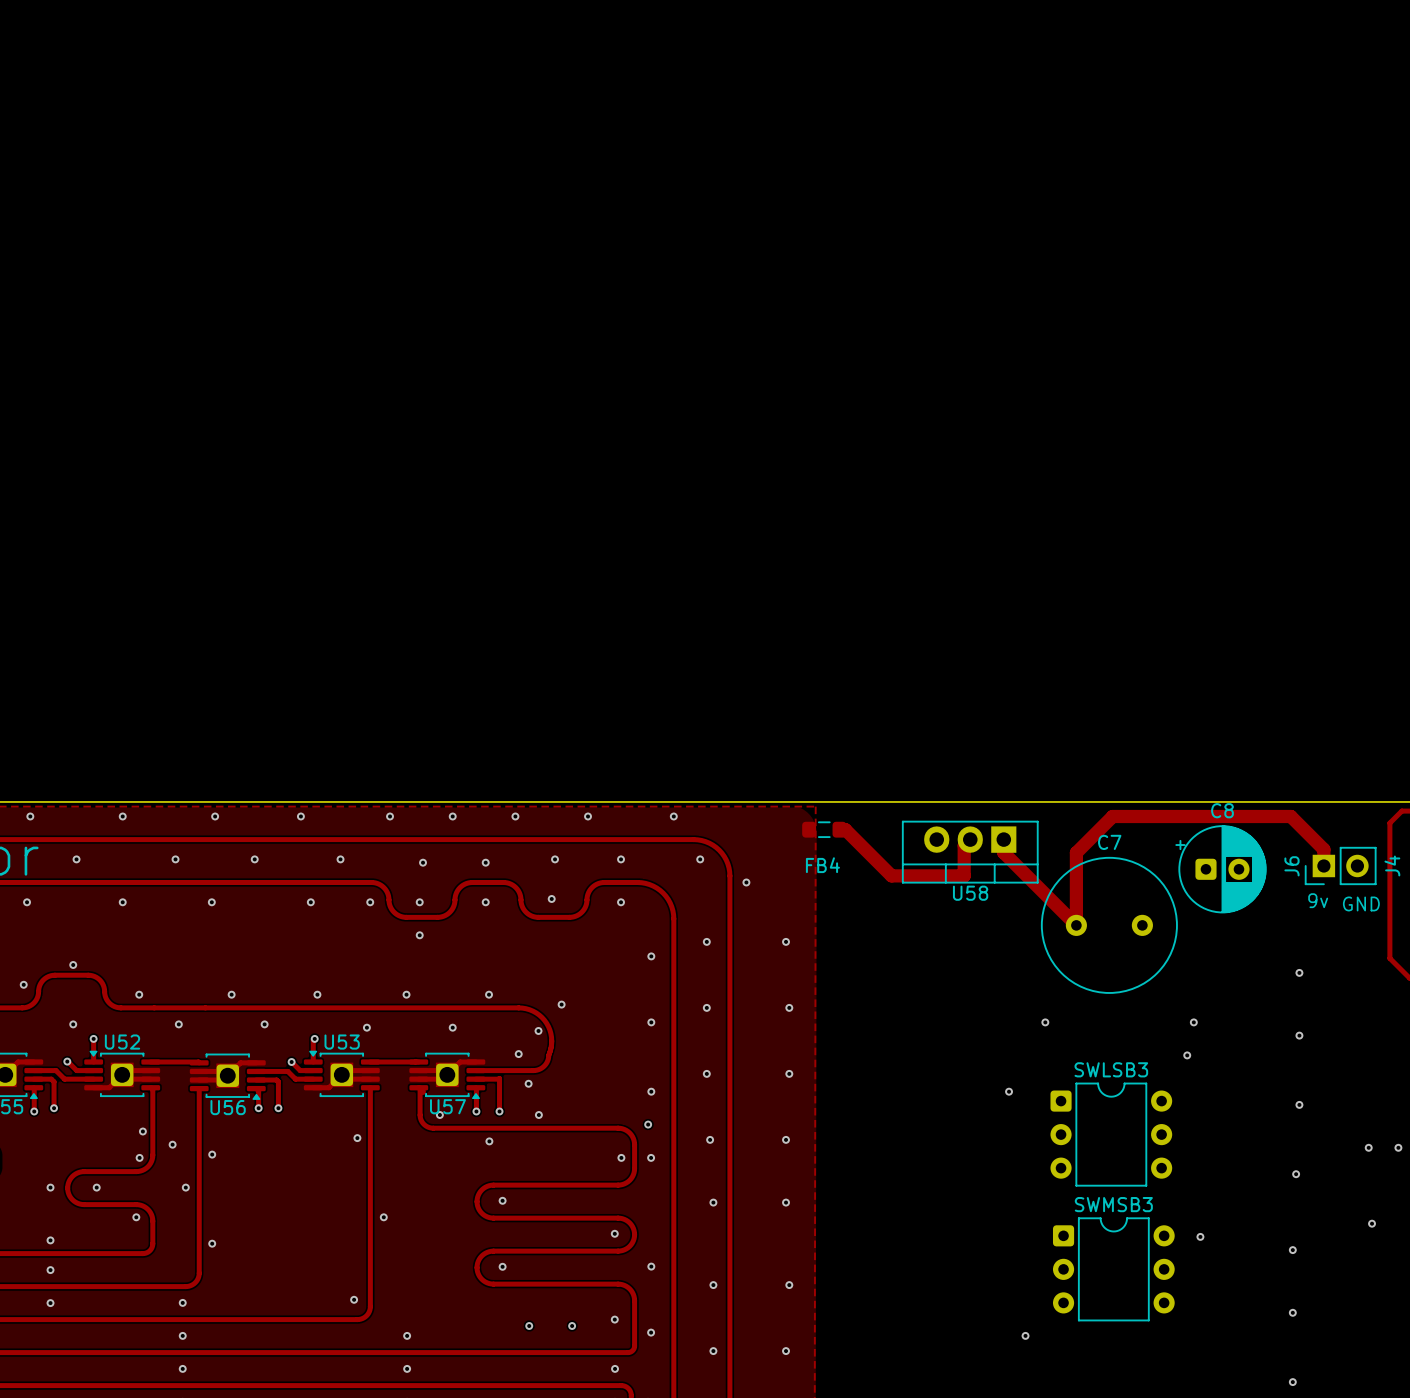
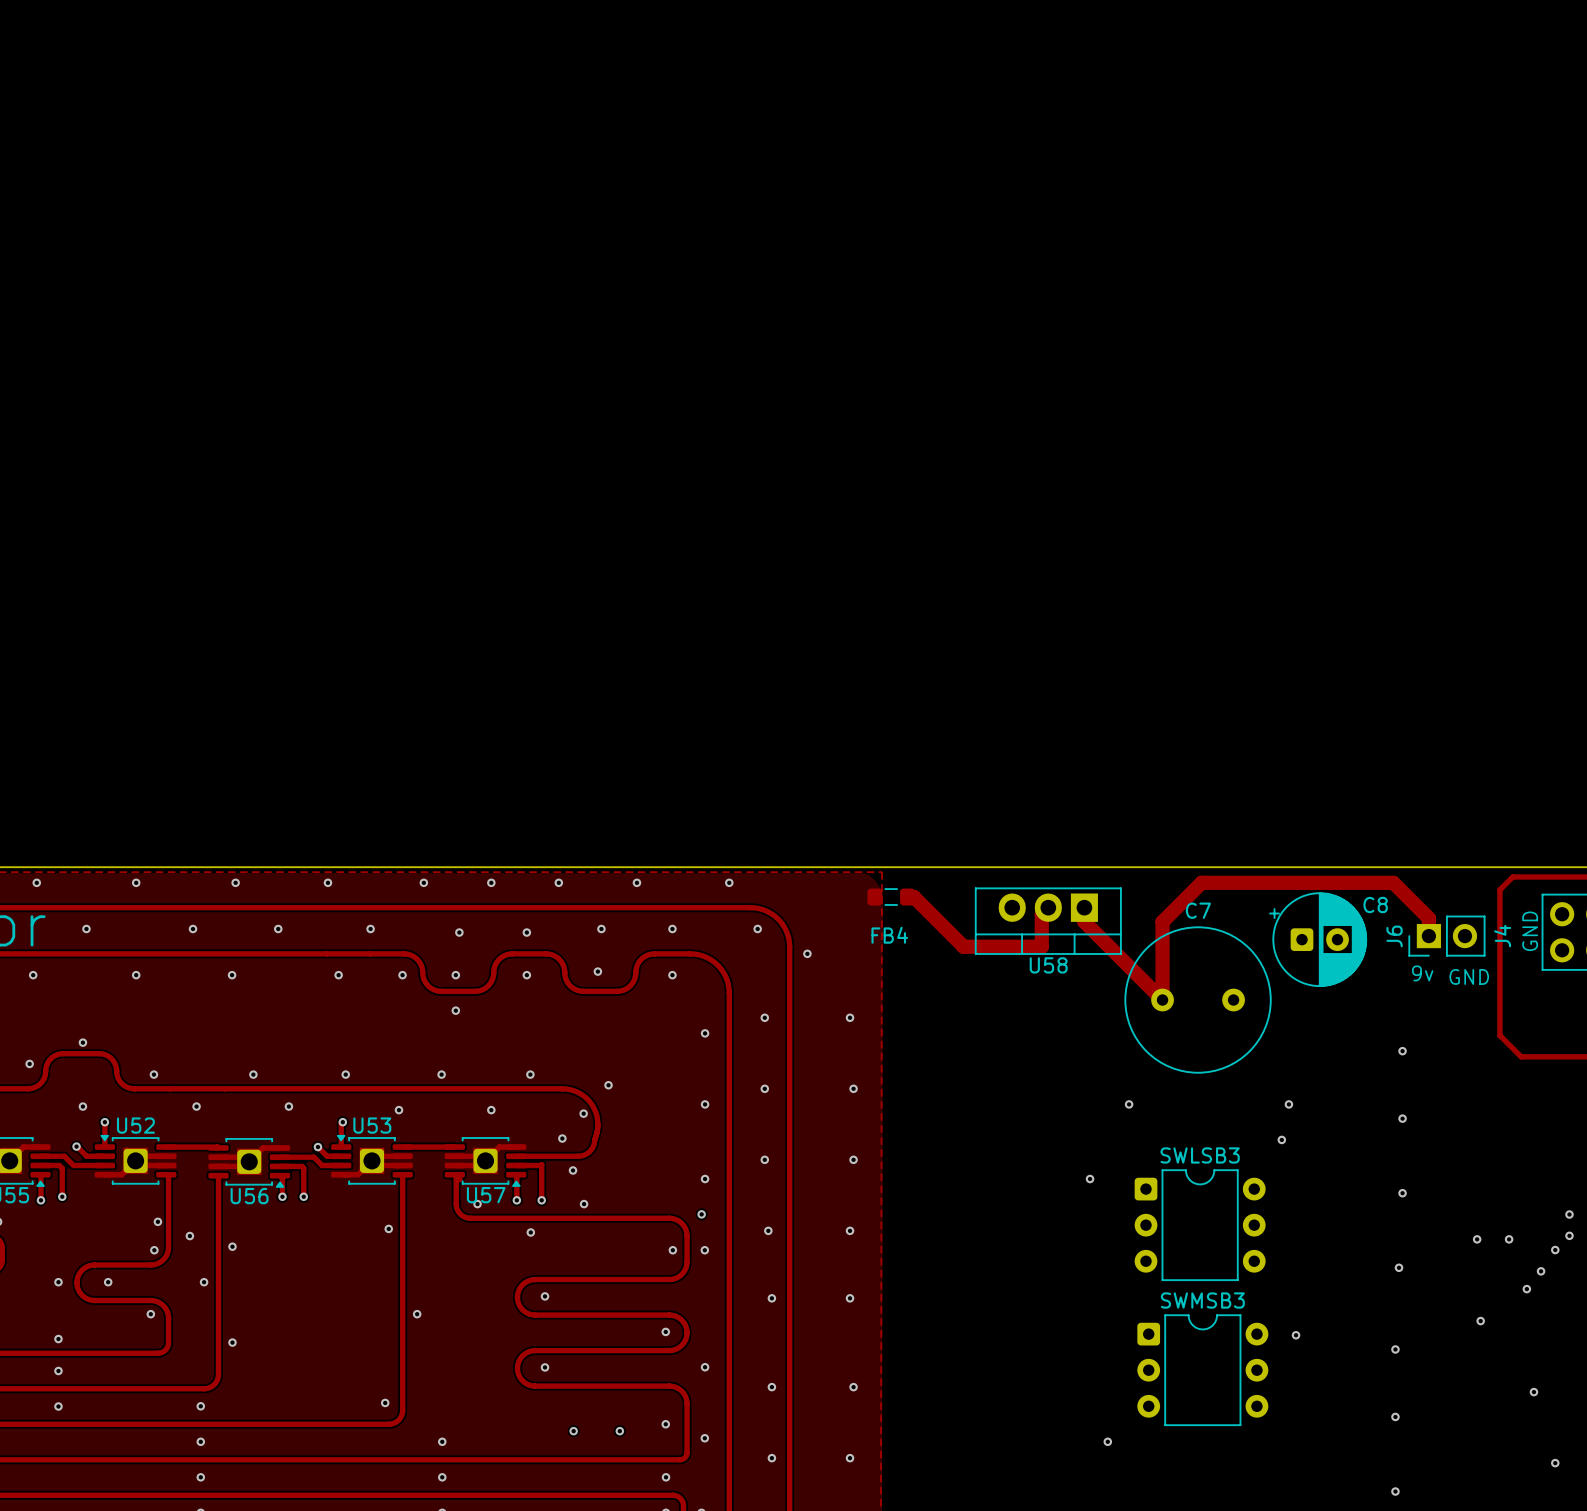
C8 name position: C8 (1222, 810) -> C8 (1375, 905)

